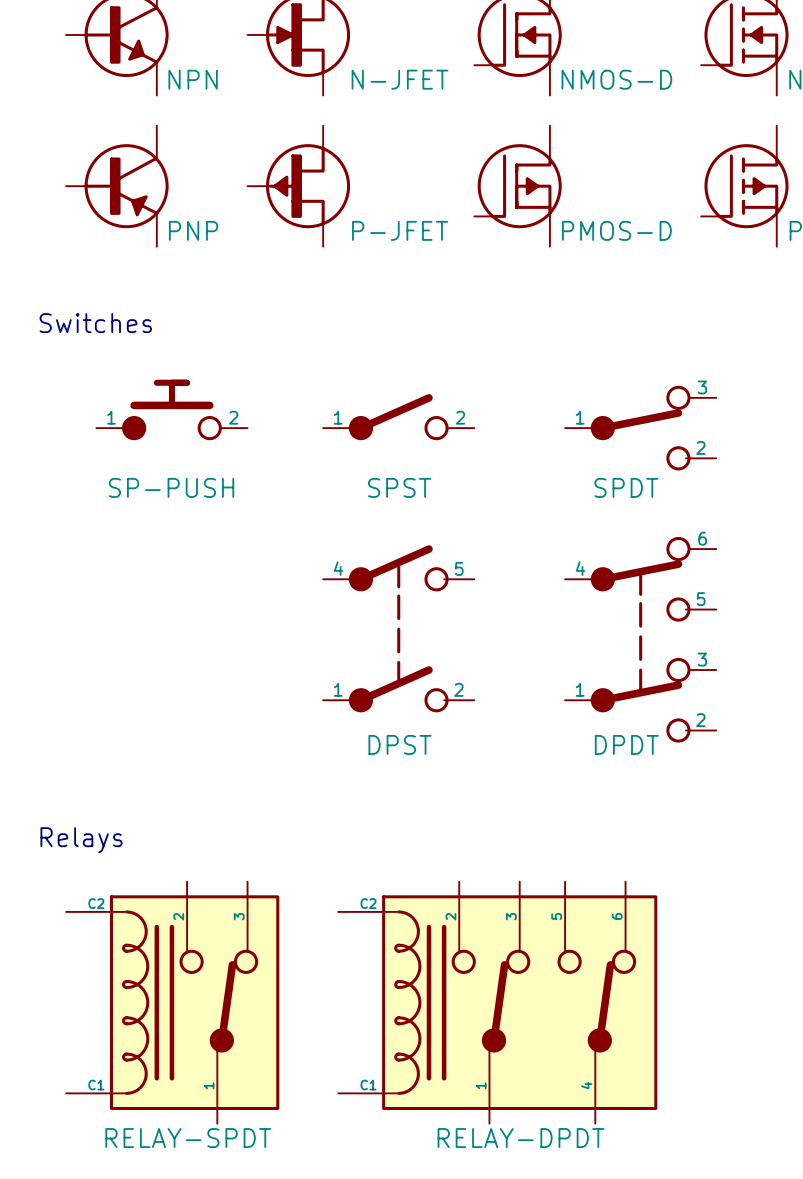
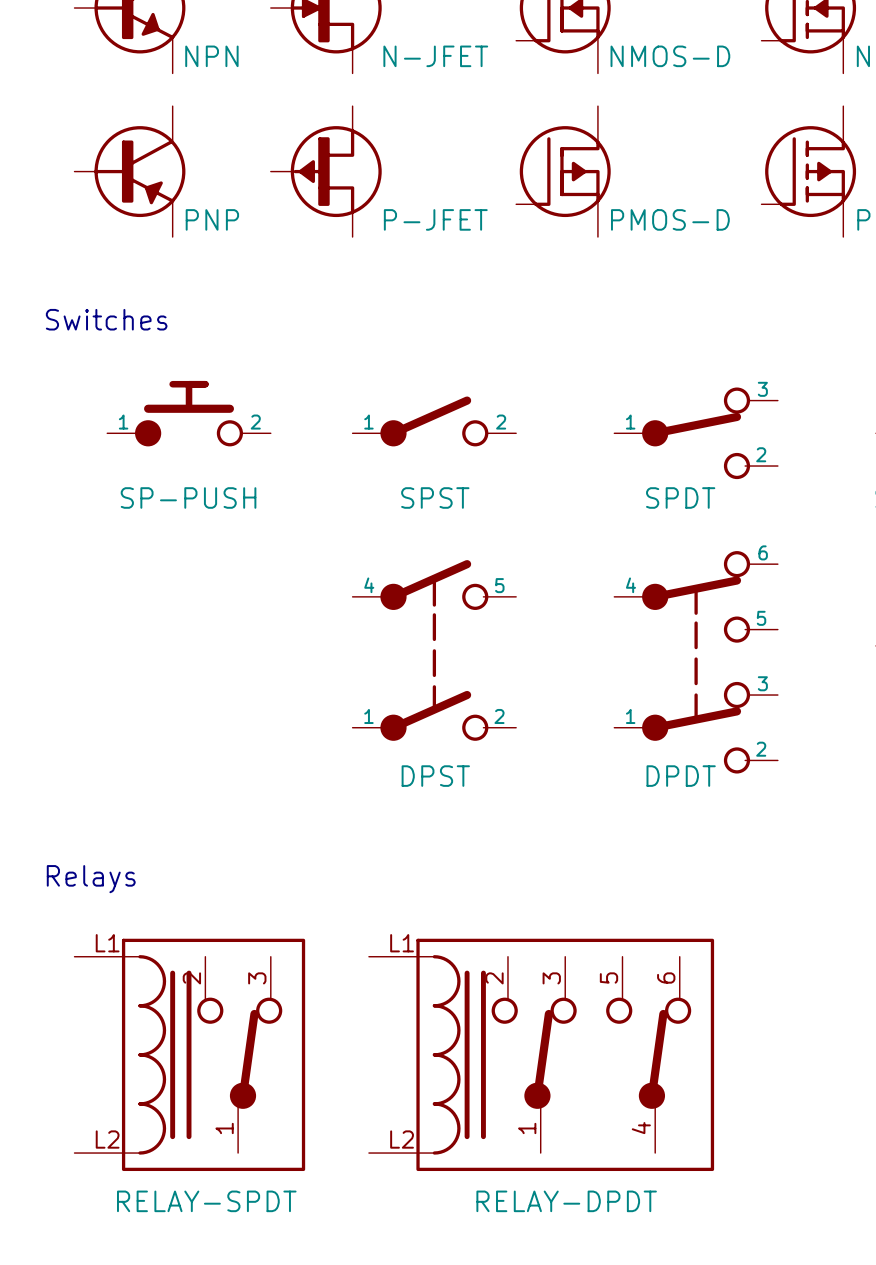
part symbol: [66, 881, 280, 1124] -> [74, 938, 306, 1172]
part symbol: [338, 881, 658, 1124] -> [368, 938, 715, 1172]

